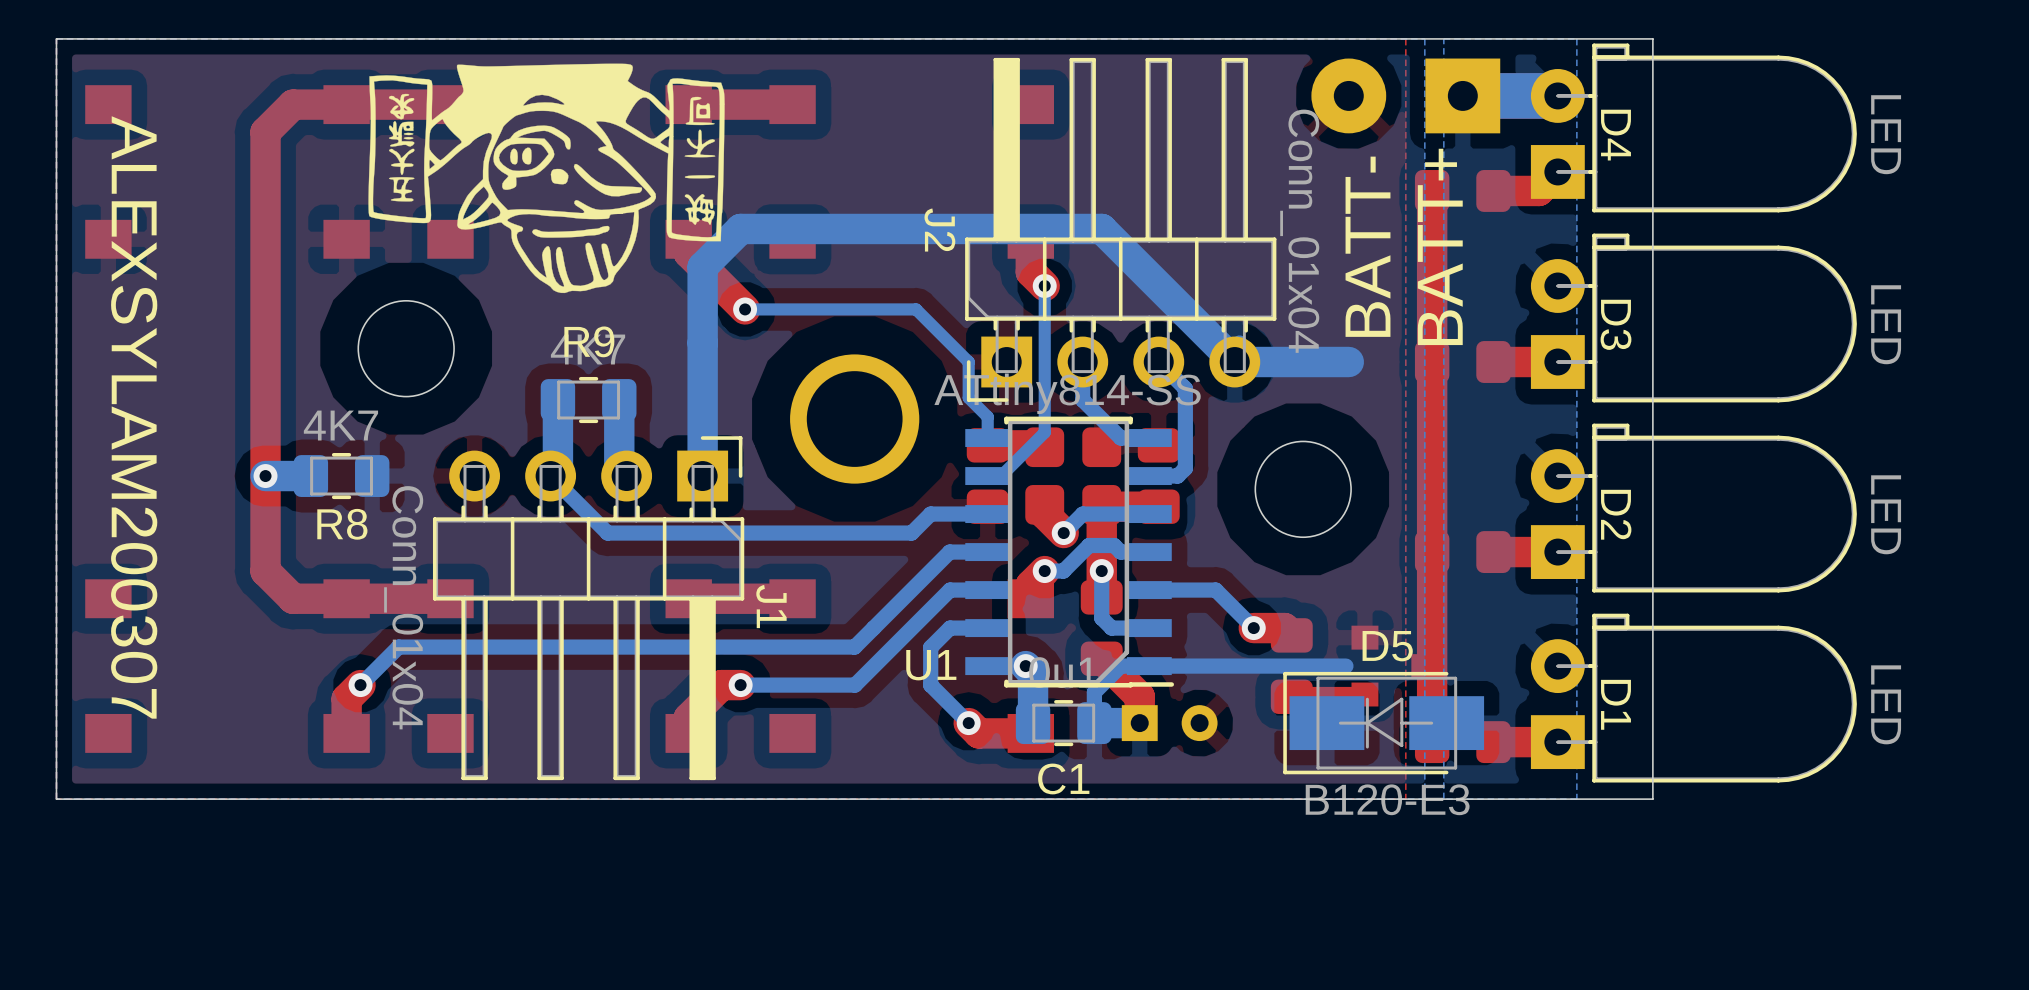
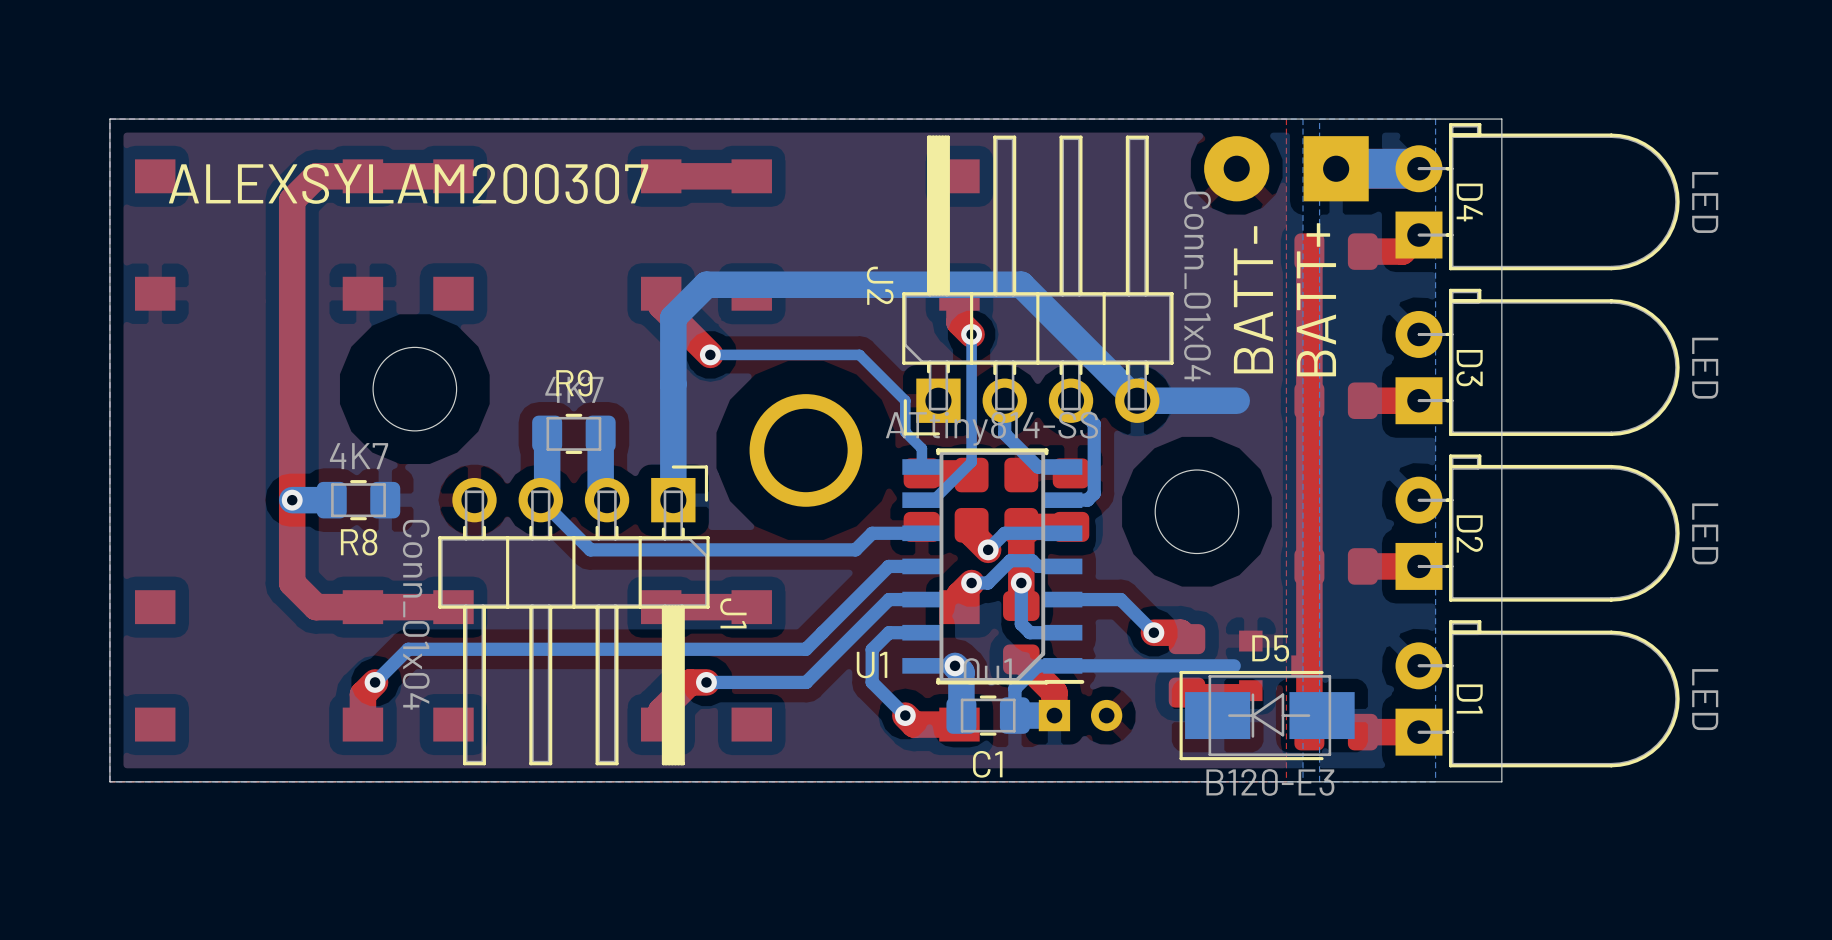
drawing: [368, 63, 725, 294] -> none
text rotation: 0° (134, 417) -> 90° counterclockwise (408, 183)

